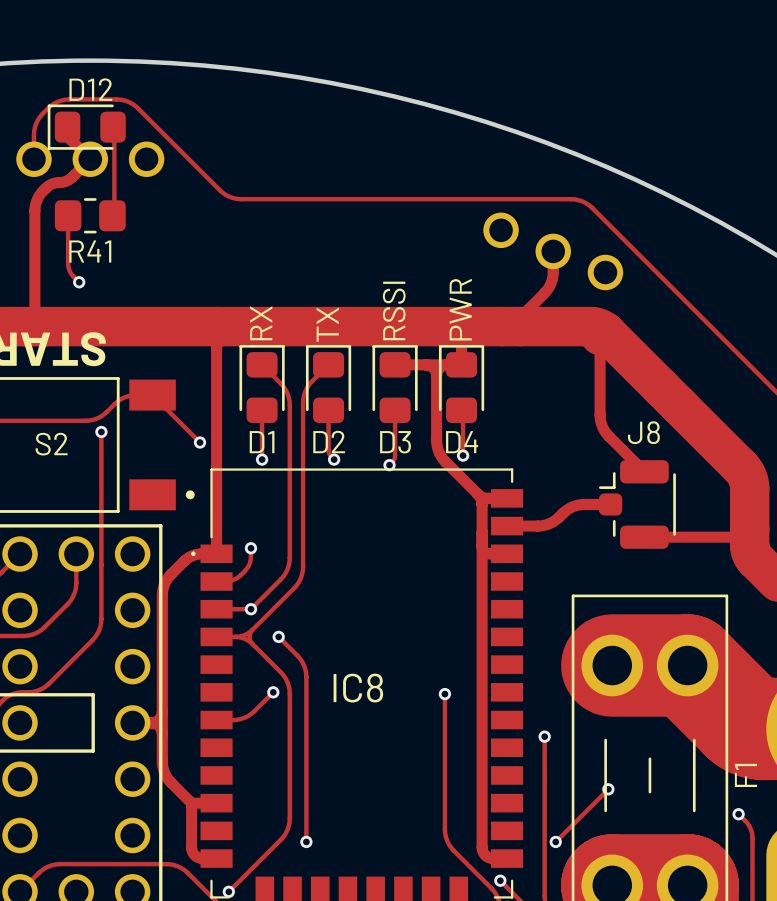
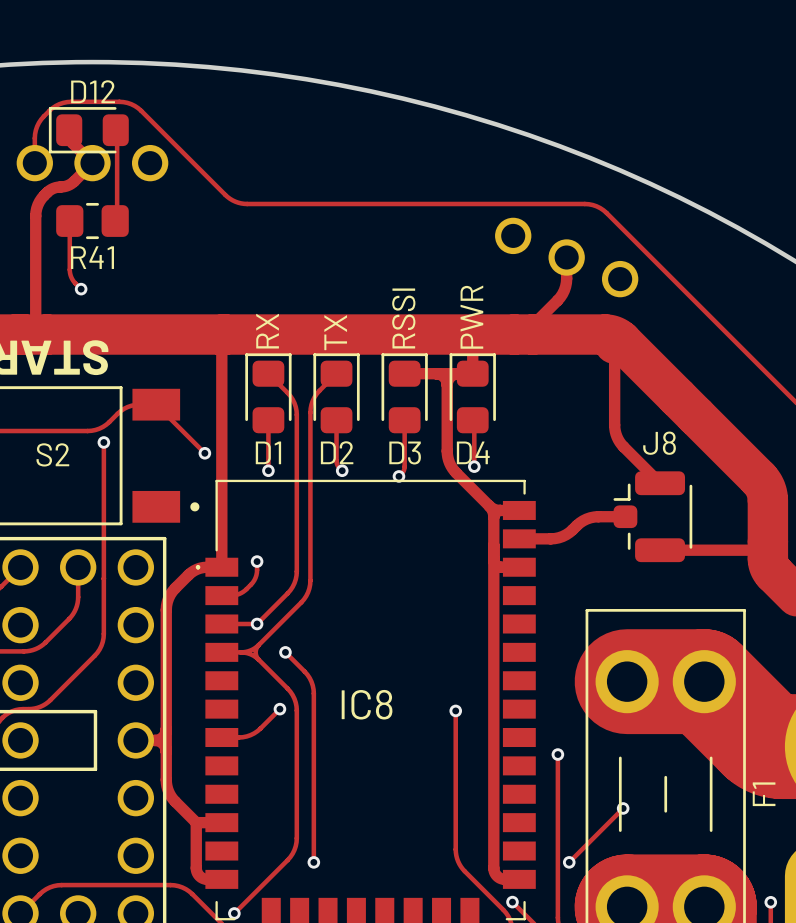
track: (738, 814) (747, 823) (751, 831) (752, 880) -> none
via position: (738, 814) -> (770, 902)

